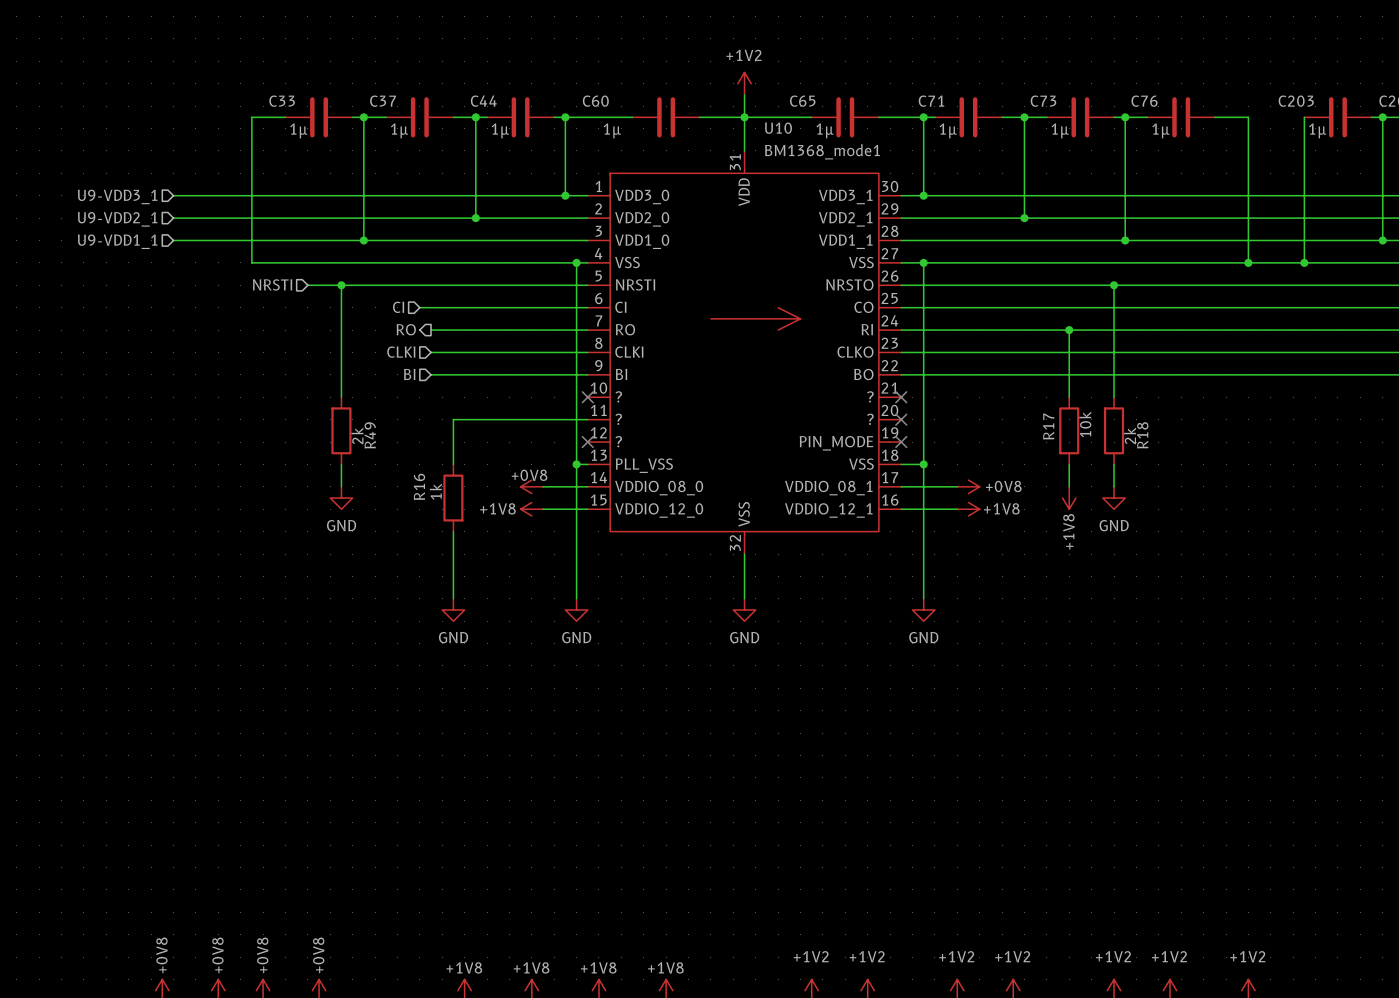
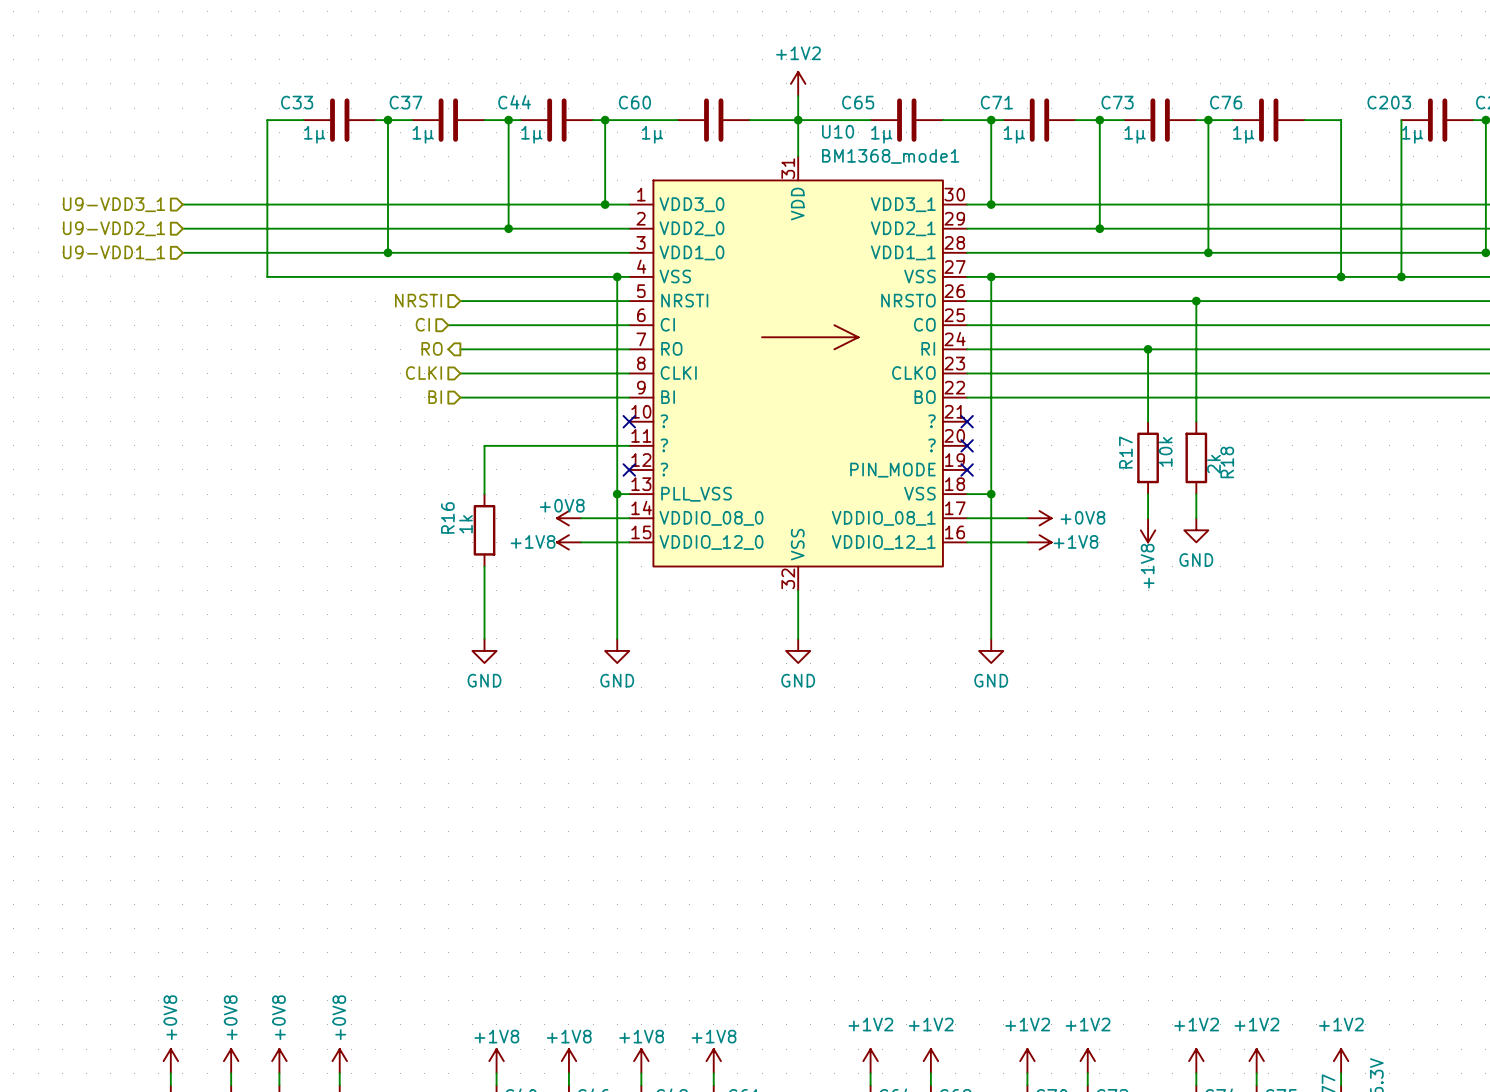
hierarchical label position: NRSTI (272, 284) -> NRSTI (418, 300)
wire: (307, 285) (431, 285) -> none
wire: (341, 285) (341, 397) -> none
junction: (341, 285) -> none
R49: 2k (341, 430) -> none
wire: (341, 464) (341, 486) -> none
power symbol: GND (341, 498) -> none

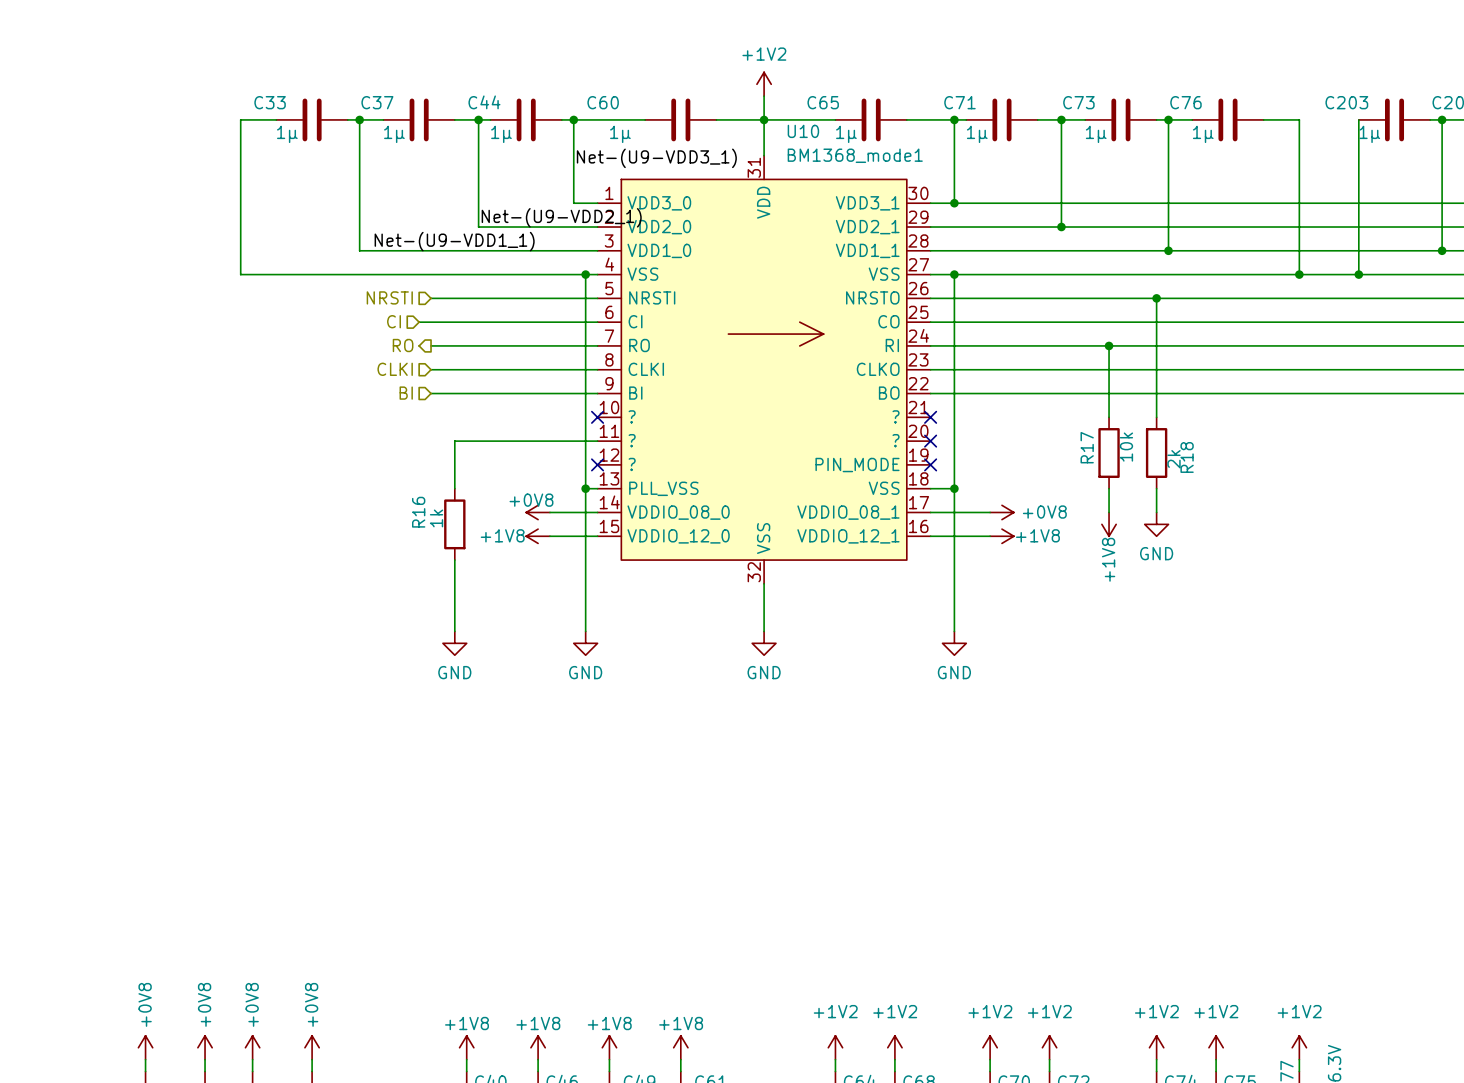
label: none -> Net-(U9-VDD3_1) (656, 158)
hierarchical label: U9-VDD3_1 (114, 204) -> none
wire: (182, 204) (605, 204) -> none
junction: (605, 204) -> none
label: none -> Net-(U9-VDD2_1) (561, 217)
hierarchical label: U9-VDD2_1 (114, 228) -> none
wire: (182, 228) (508, 228) -> none
junction: (508, 228) -> none
label: none -> Net-(U9-VDD1_1) (454, 241)
hierarchical label: U9-VDD1_1 (114, 252) -> none
wire: (182, 252) (387, 252) -> none
junction: (387, 252) -> none

